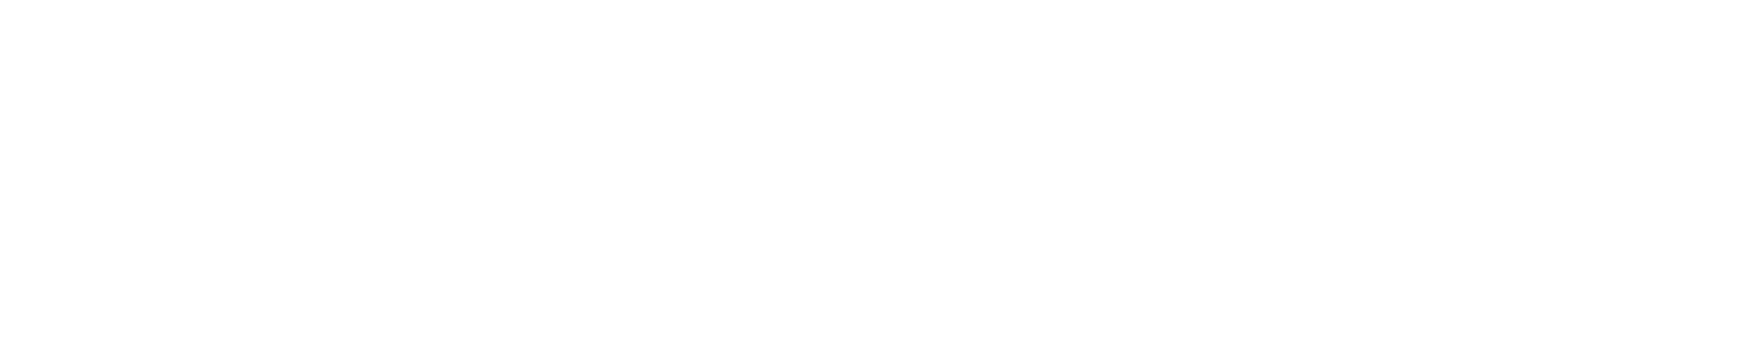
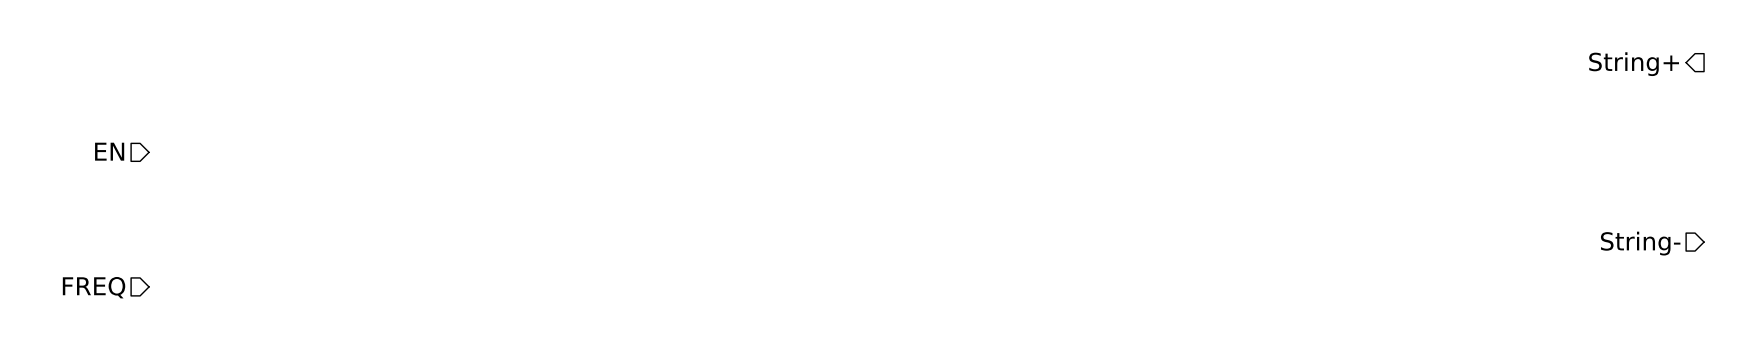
hierarchical label: none -> String+ (1634, 64)
hierarchical label: none -> EN (109, 151)
hierarchical label: none -> String- (1640, 243)
hierarchical label: none -> FREQ (94, 287)

